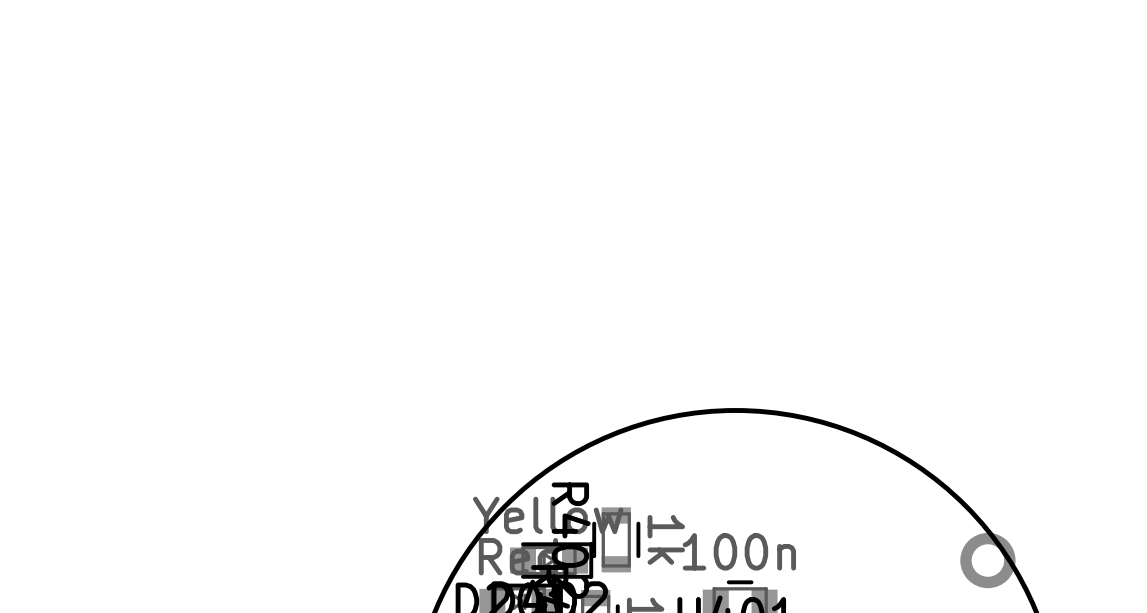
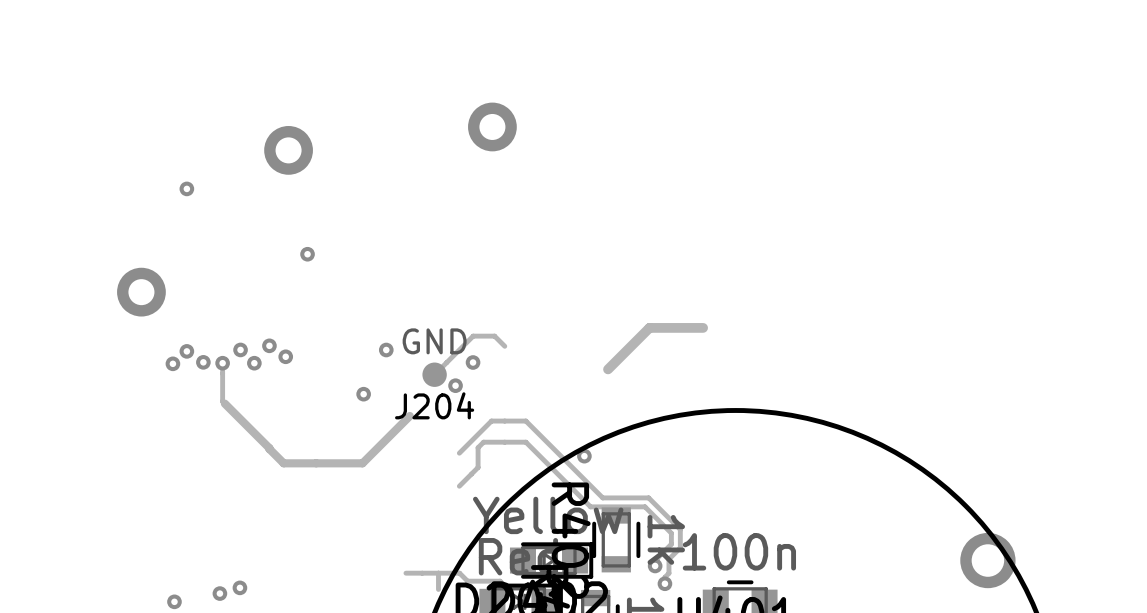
part: none -> (492, 126)
part: none -> (288, 150)
via: none -> (186, 188)
via: none -> (307, 254)
part: none -> (141, 292)
track: none -> (703, 327) (649, 327) (608, 369)
via: none -> (269, 345)
track: none -> (504, 346) (494, 336) (473, 336) (434, 374)
via: none -> (240, 349)
via: none -> (386, 350)
via: none -> (186, 351)
via: none -> (285, 356)
via: none -> (203, 362)
via: none -> (473, 362)
via: none -> (172, 363)
track: none -> (222, 363) (222, 401) (283, 463) (362, 463) (409, 416)
via: none -> (222, 363)
via: none -> (254, 363)
J204: none -> GND (434, 374)
via: none -> (455, 385)
via: none -> (363, 394)
track: none -> (459, 453) (491, 421) (525, 421) (602, 497) (648, 497) (680, 529) (680, 547) (668, 559) (668, 573) (664, 577) (664, 583)
via: none -> (584, 456)
track: none -> (459, 486) (478, 467) (478, 447) (483, 442) (525, 442) (590, 506) (645, 506) (671, 533) (671, 544) (657, 558) (655, 565)
via: none -> (655, 565)
track: none -> (405, 573) (459, 573) (467, 581) (500, 581) (505, 586) (526, 586)
track: none -> (438, 573) (438, 589)
via: none -> (664, 583)
via: none -> (239, 587)
via: none -> (219, 593)
via: none -> (174, 601)

